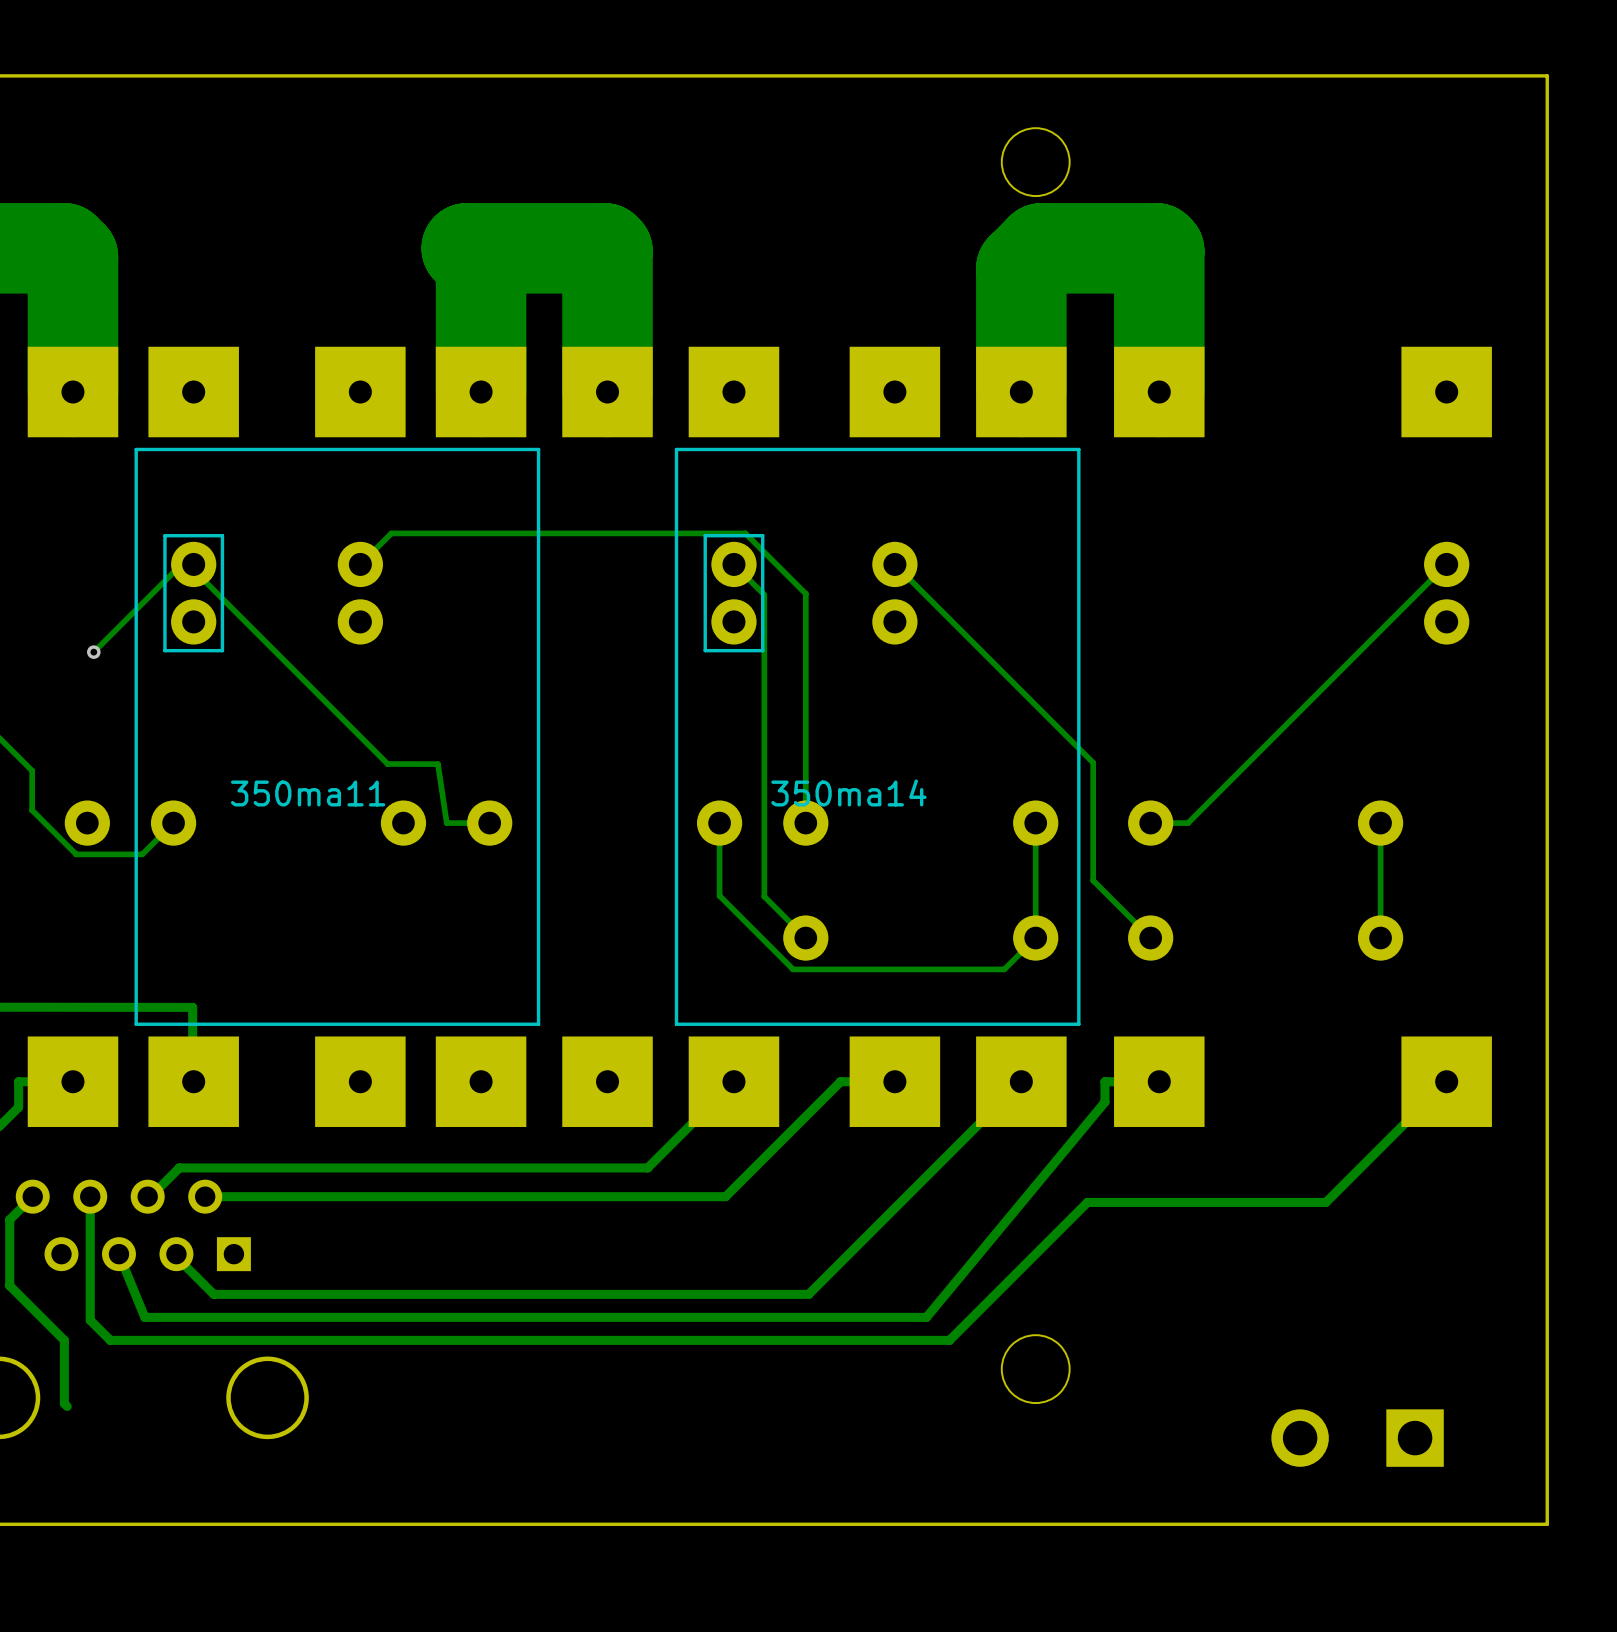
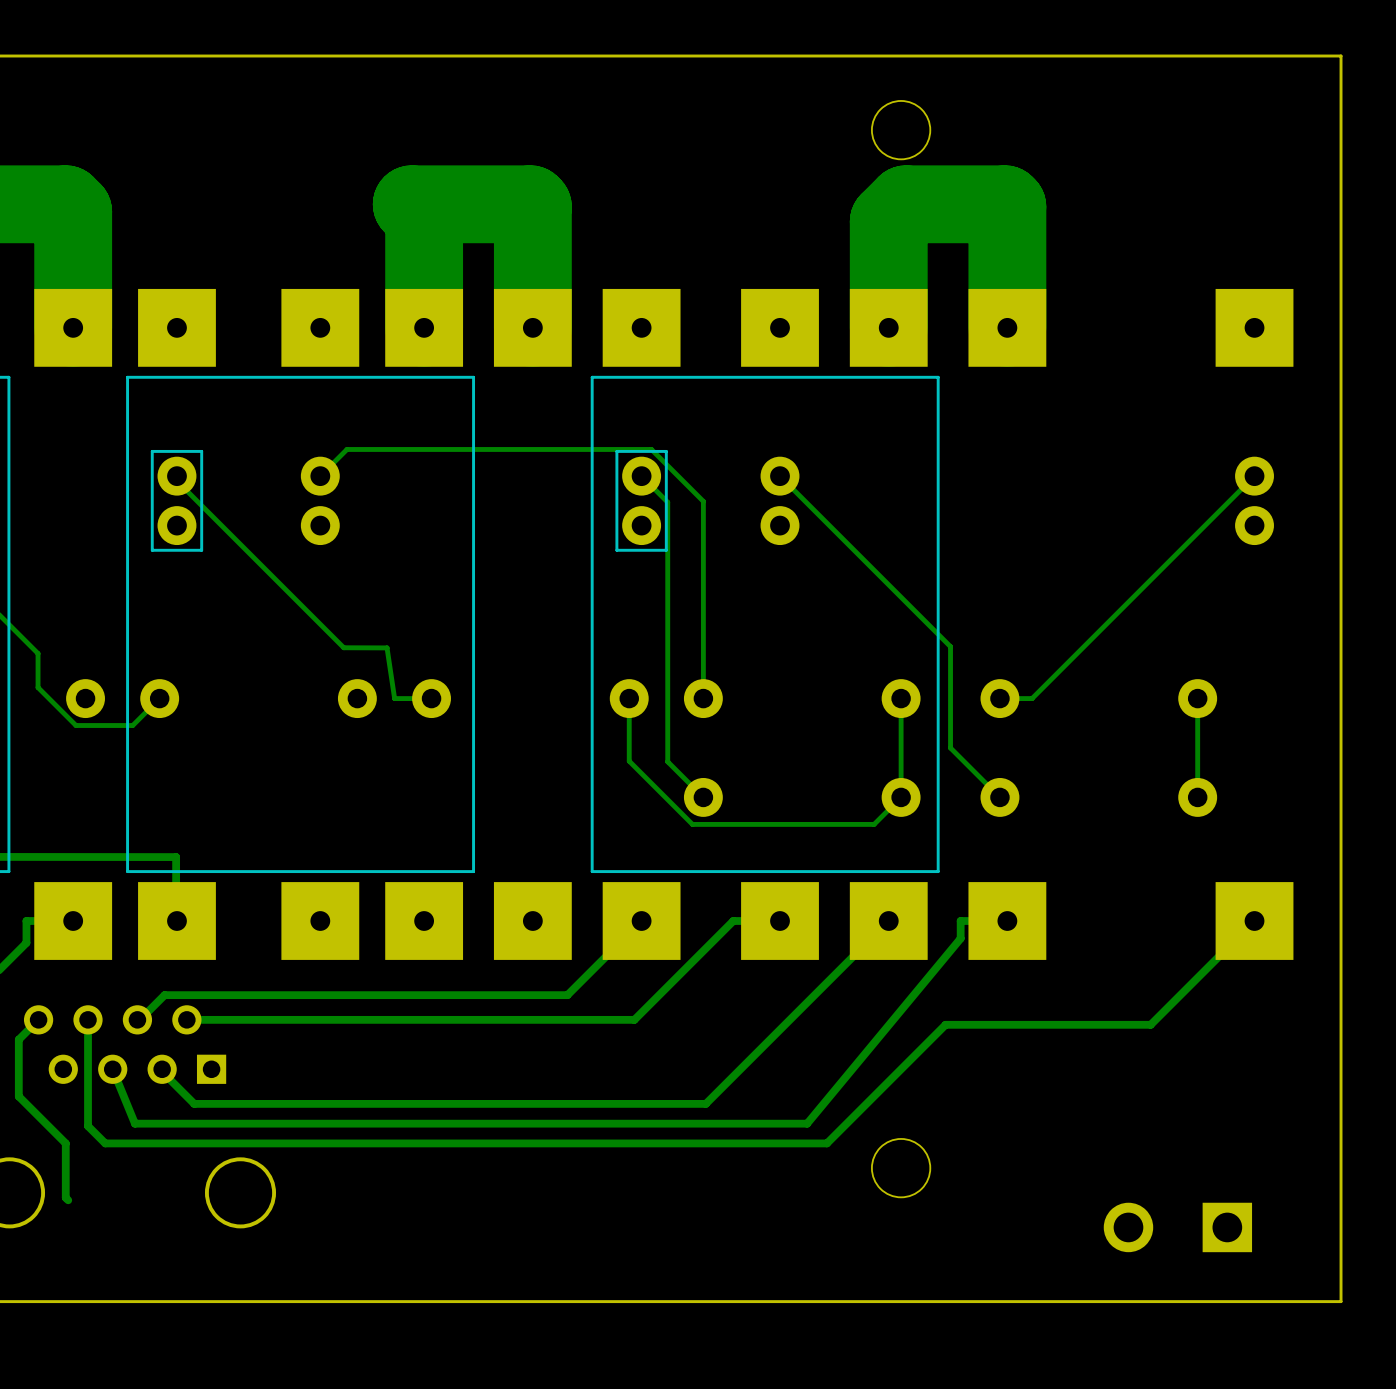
track: (175, 570) (93, 652) -> none
via: (93, 652) -> none
350ma14 name: 350ma14 (848, 792) -> none
350ma11 name: 350ma11 (308, 793) -> none

